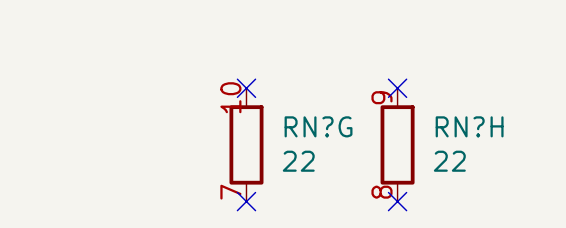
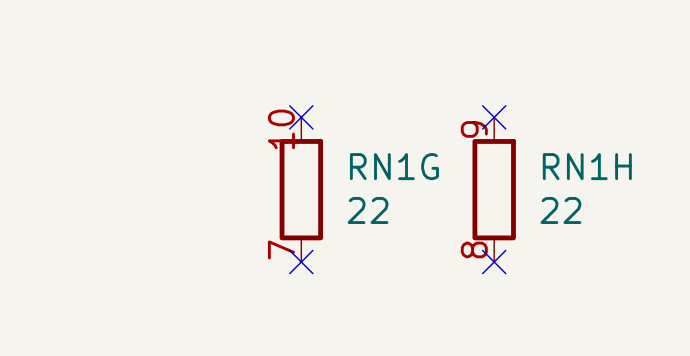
RN?G name: RN?G (318, 126) -> RN1G (394, 166)
RN?H name: RN?H (469, 126) -> RN1H (587, 166)

